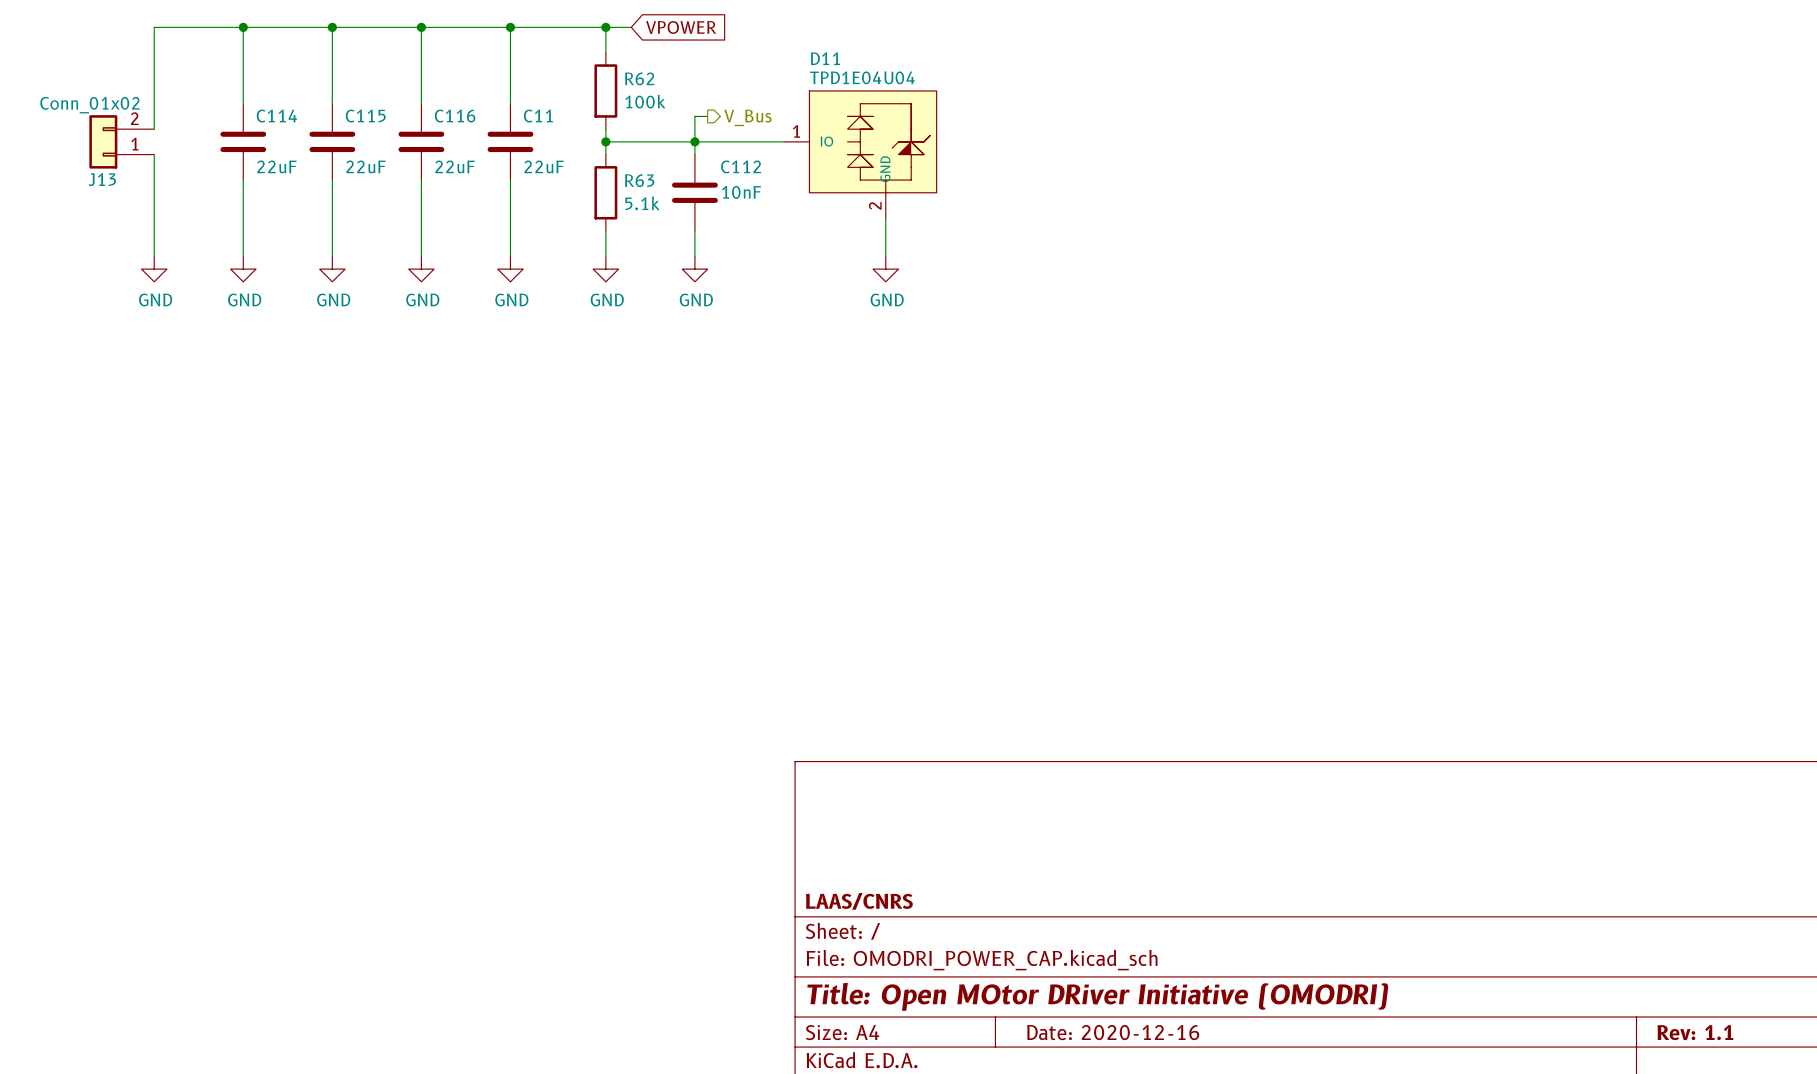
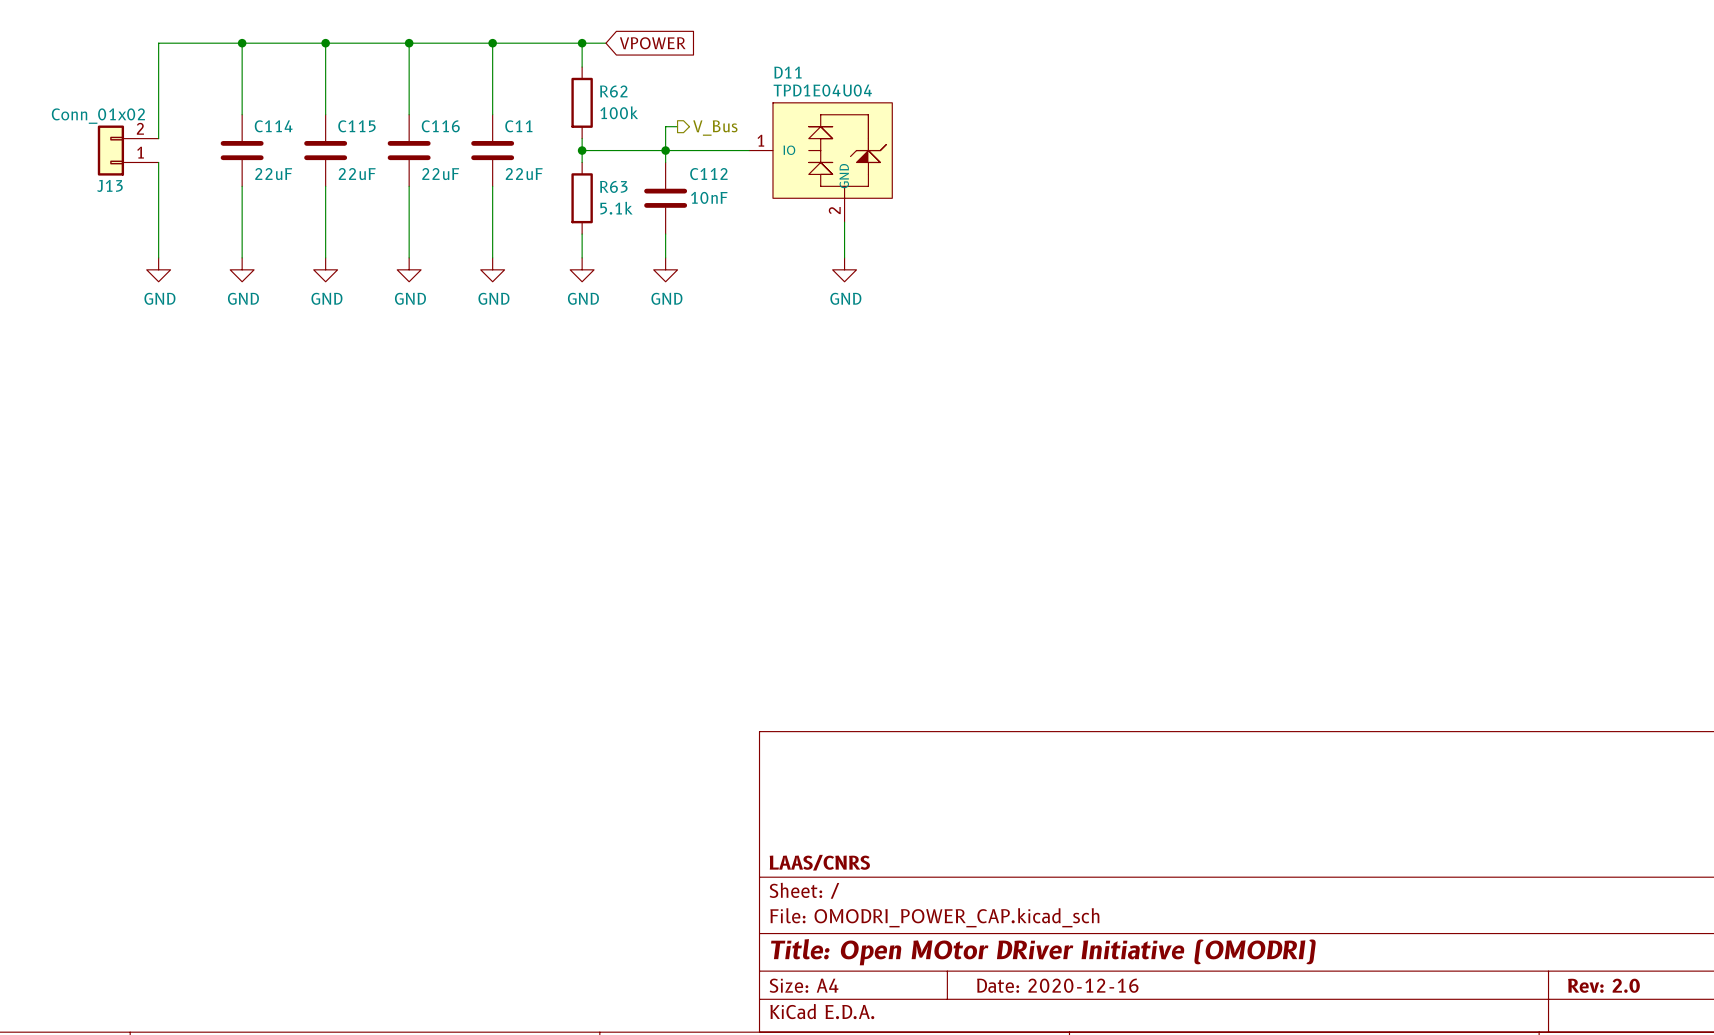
title block: Rev: 1.1 (1695, 1032) -> Rev: 2.0 (1603, 985)

